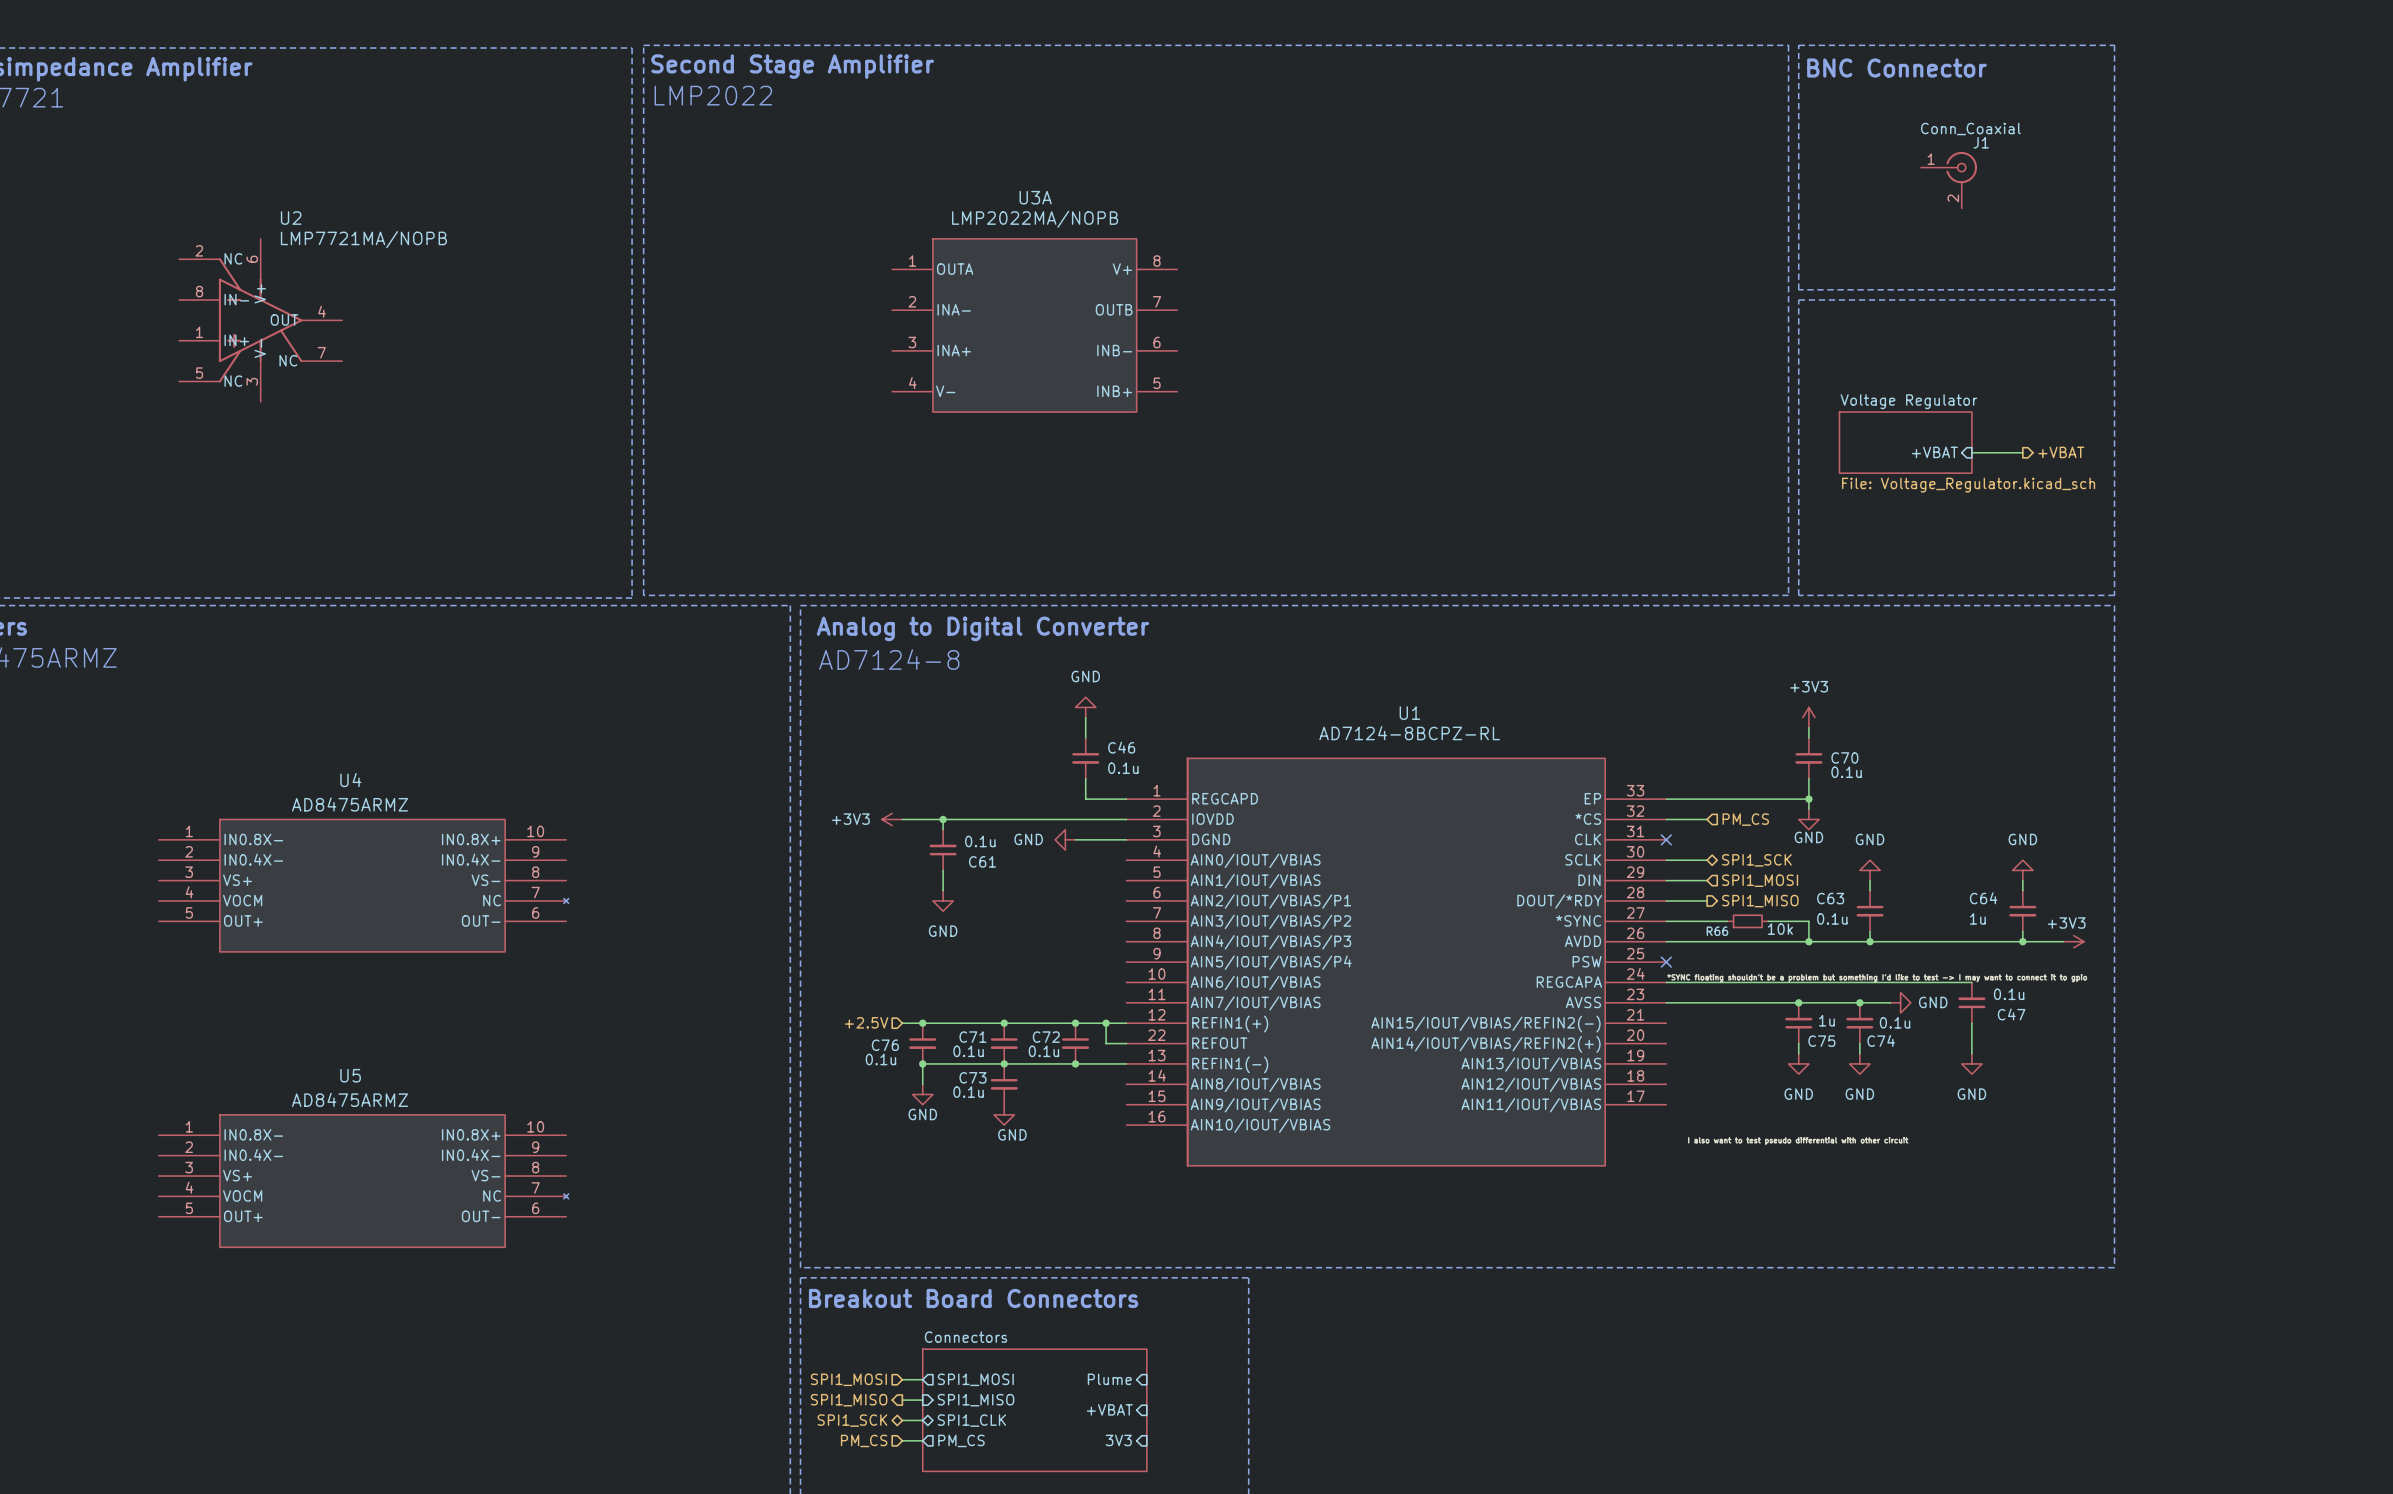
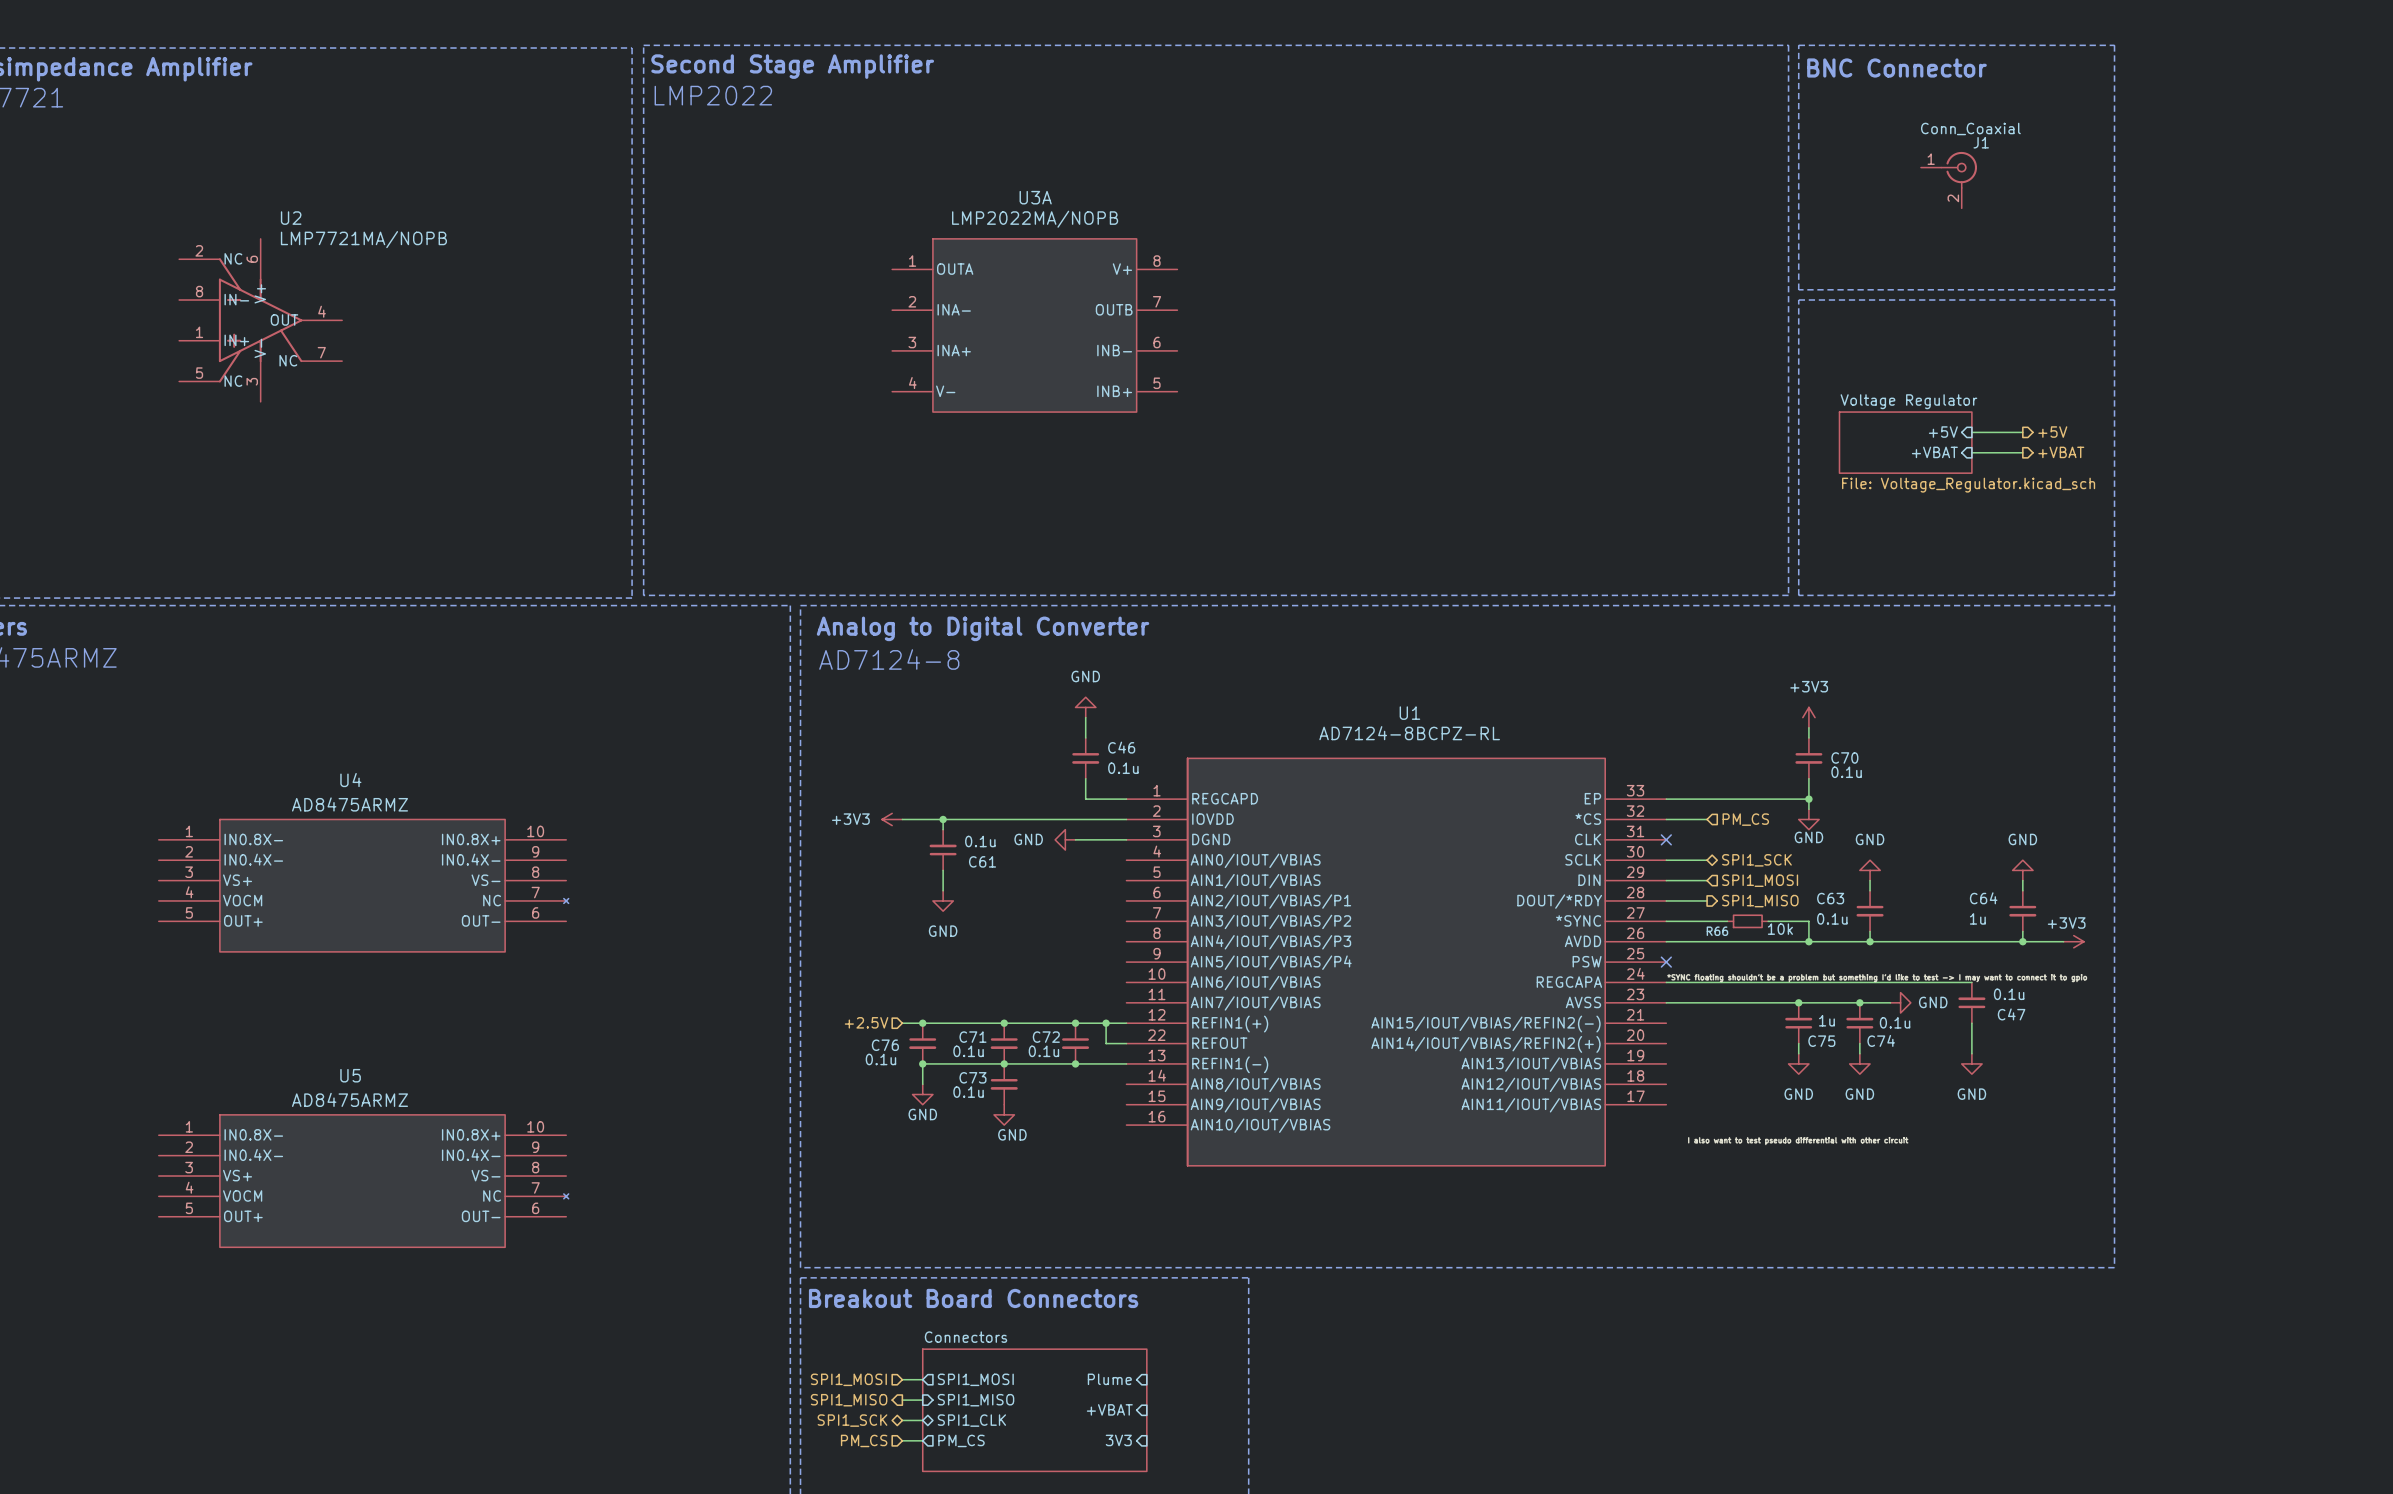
sheet pin: none -> +5V (1943, 432)
wire: none -> (1971, 432) (2022, 432)
hierarchical label: none -> +5V (2052, 432)

